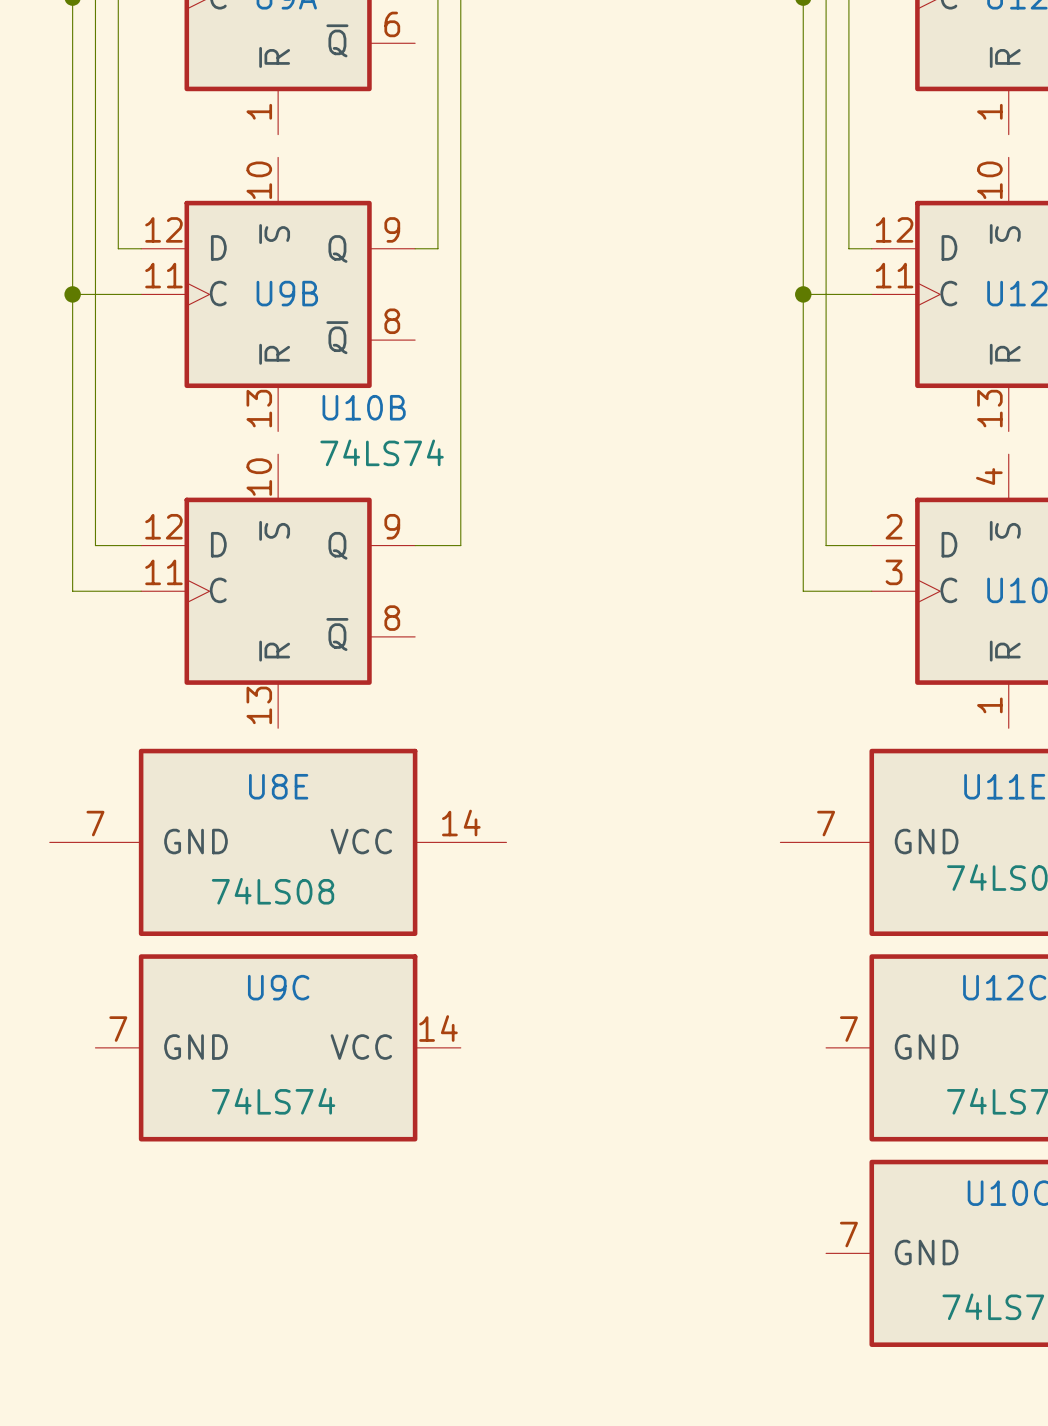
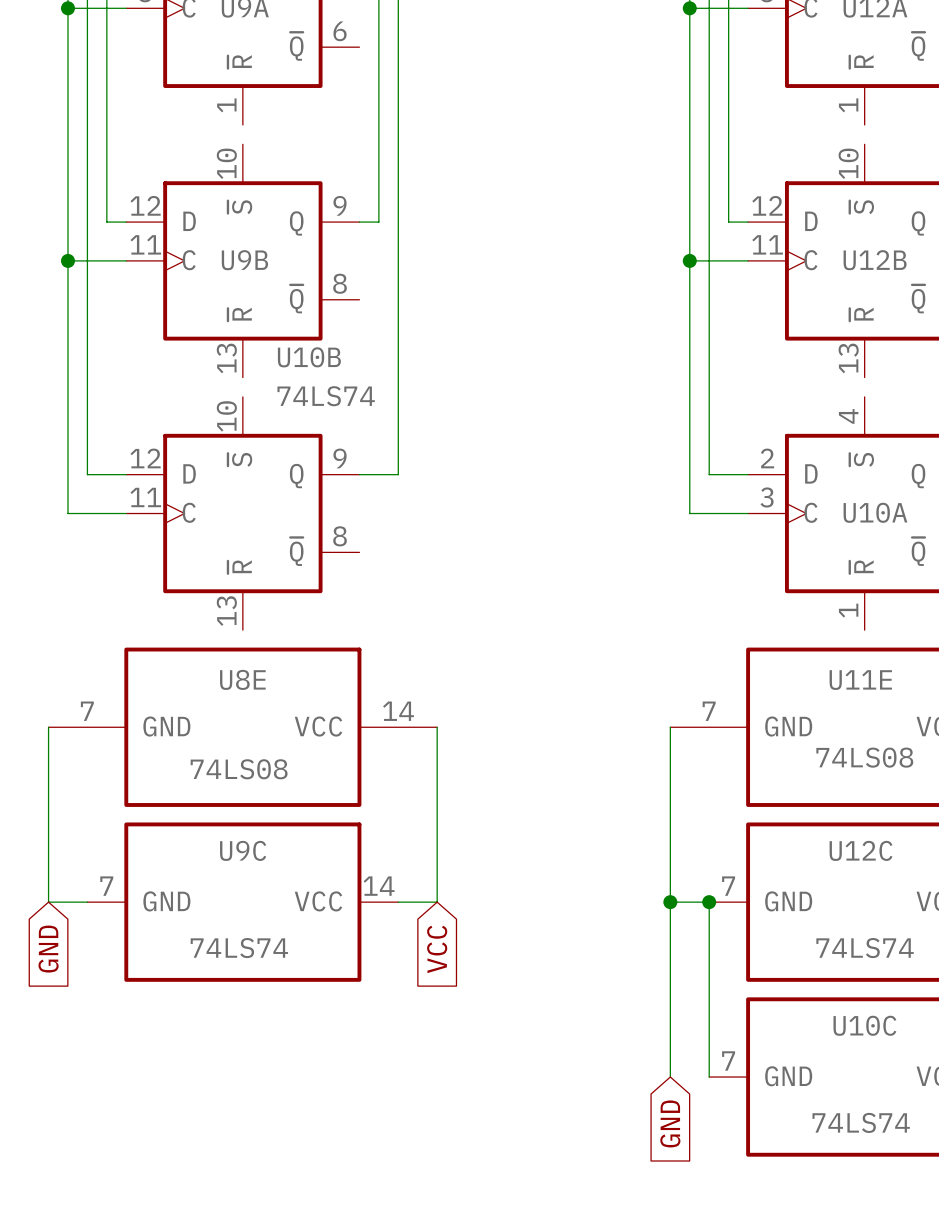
wire: none -> (48, 727) (48, 902) (87, 902)
wire: none -> (437, 727) (437, 902) (398, 902)
wire: none -> (670, 727) (670, 1077)
wire: none -> (670, 902) (709, 902) (709, 1077)
junction: none -> (670, 902)
junction: none -> (709, 902)
global label: none -> VCC (437, 949)
global label: none -> GND (48, 949)
global label: none -> GND (670, 1123)

